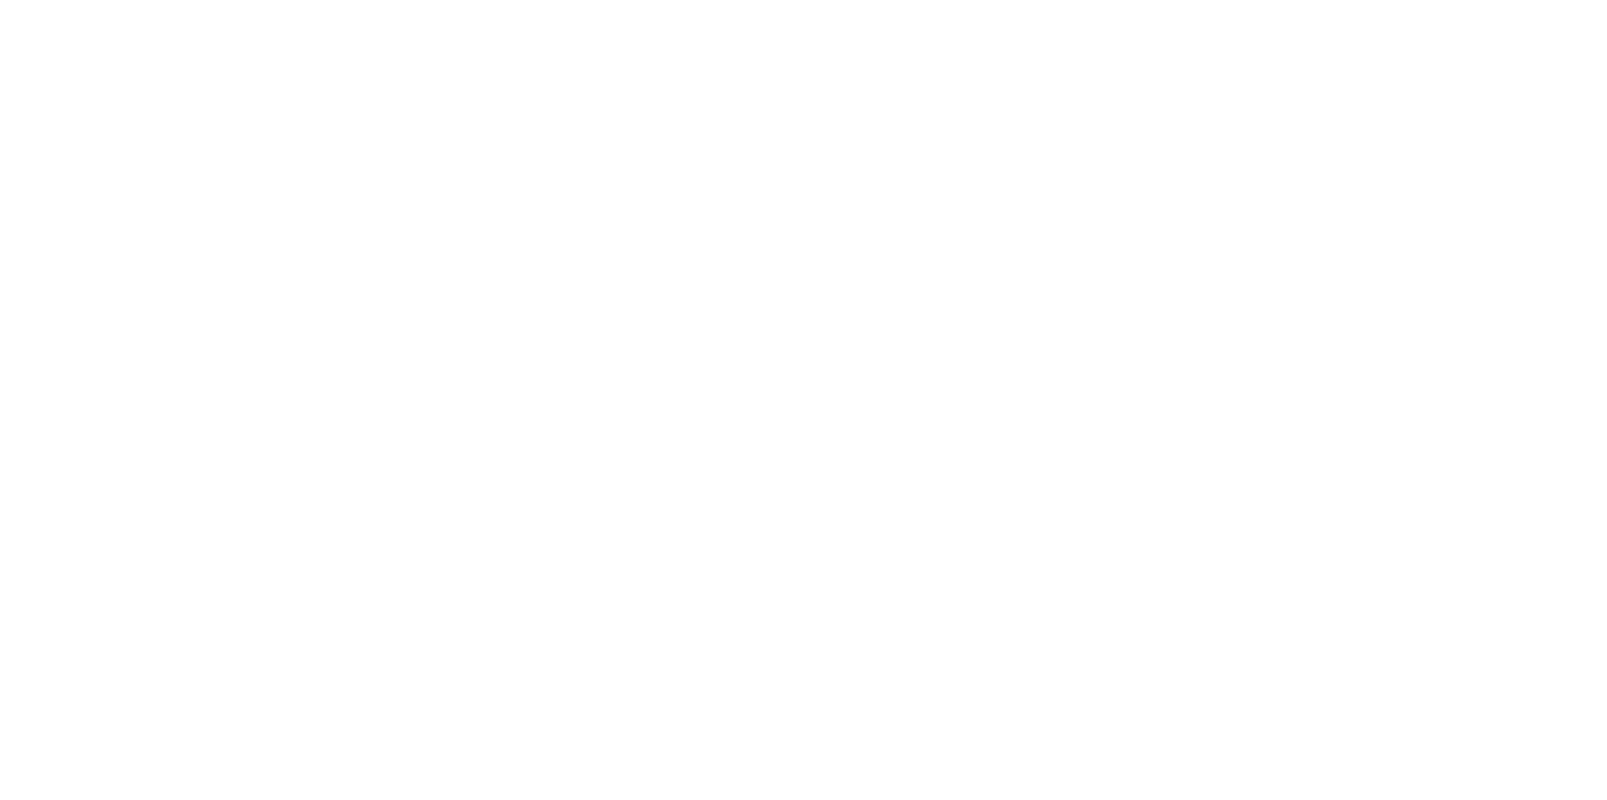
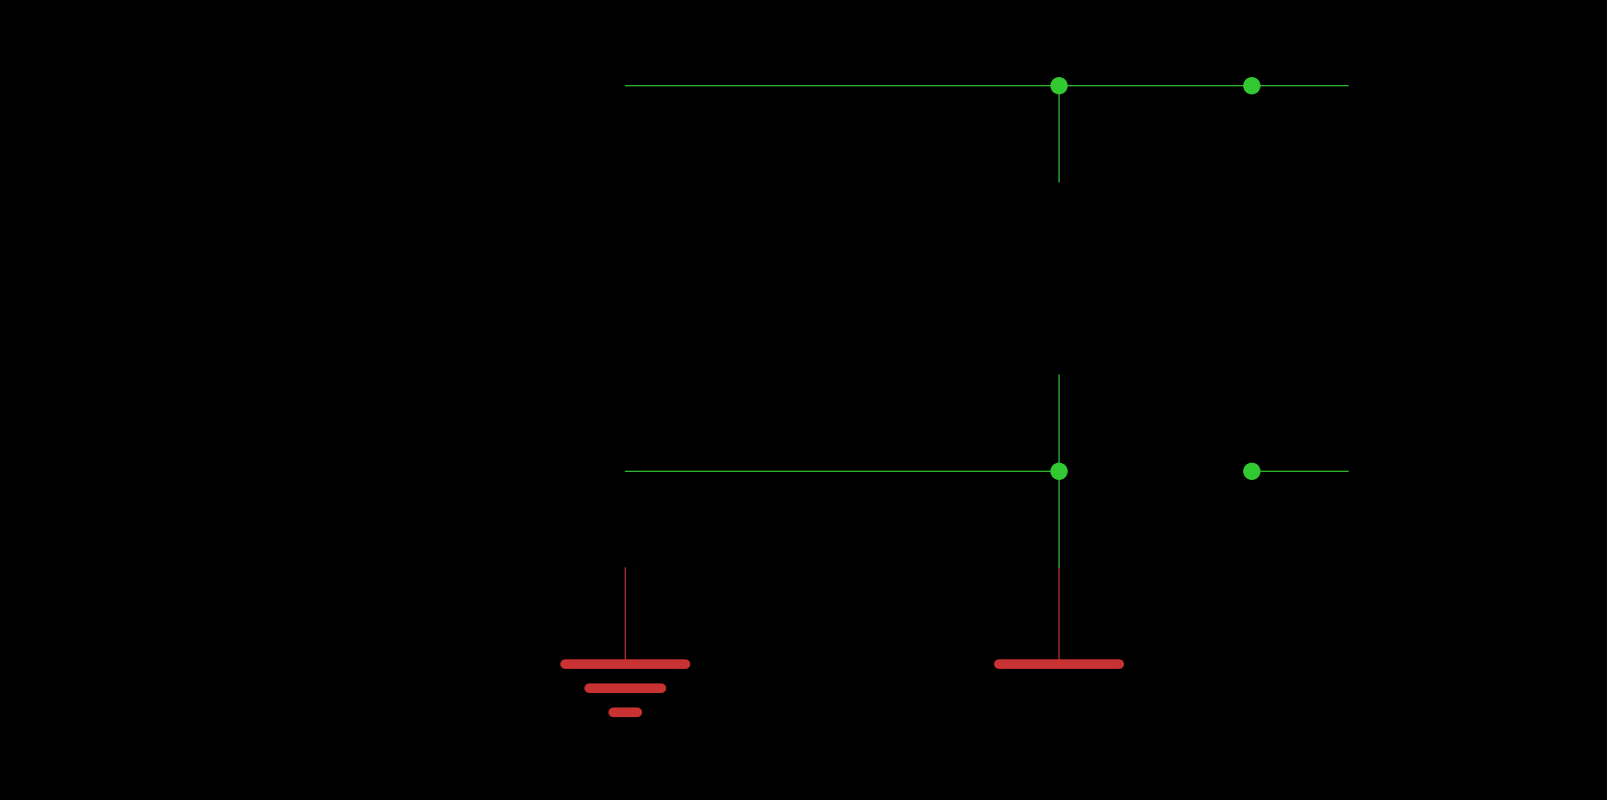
wire: none -> (625, 85) (1348, 85)
wire: none -> (1059, 85) (1059, 182)
junction: none -> (1059, 85)
junction: none -> (1251, 85)
wire: none -> (1059, 374) (1059, 567)
wire: none -> (625, 471) (1059, 471)
junction: none -> (1059, 471)
wire: none -> (1251, 471) (1348, 471)
junction: none -> (1251, 471)
power symbol: none -> (1059, 618)
power symbol: none -> (625, 642)

